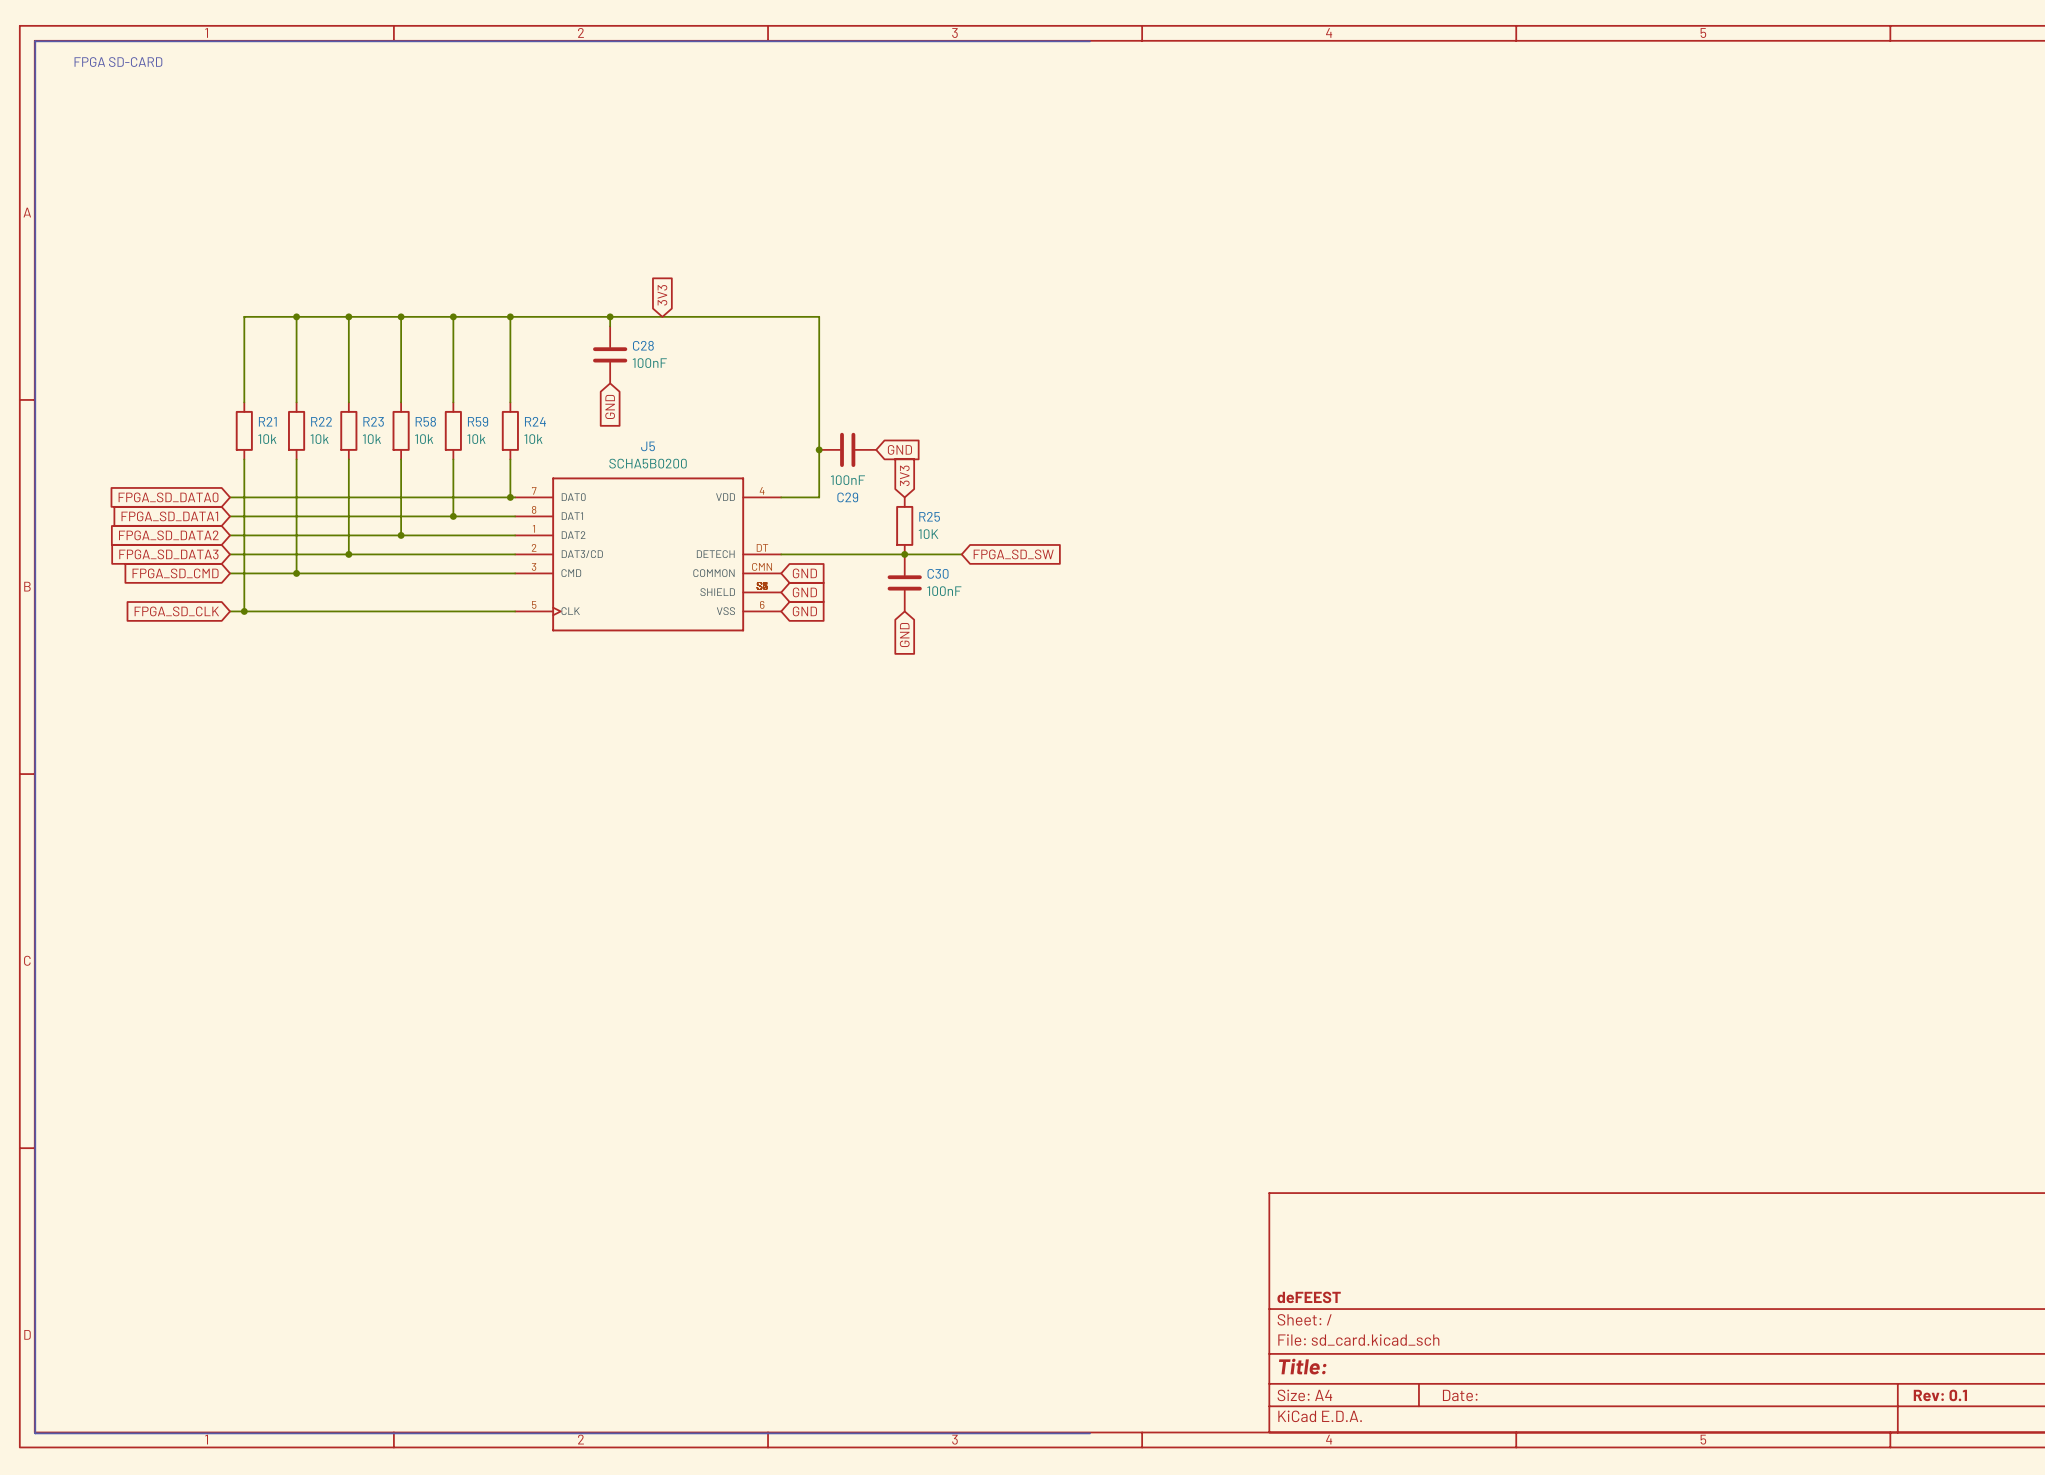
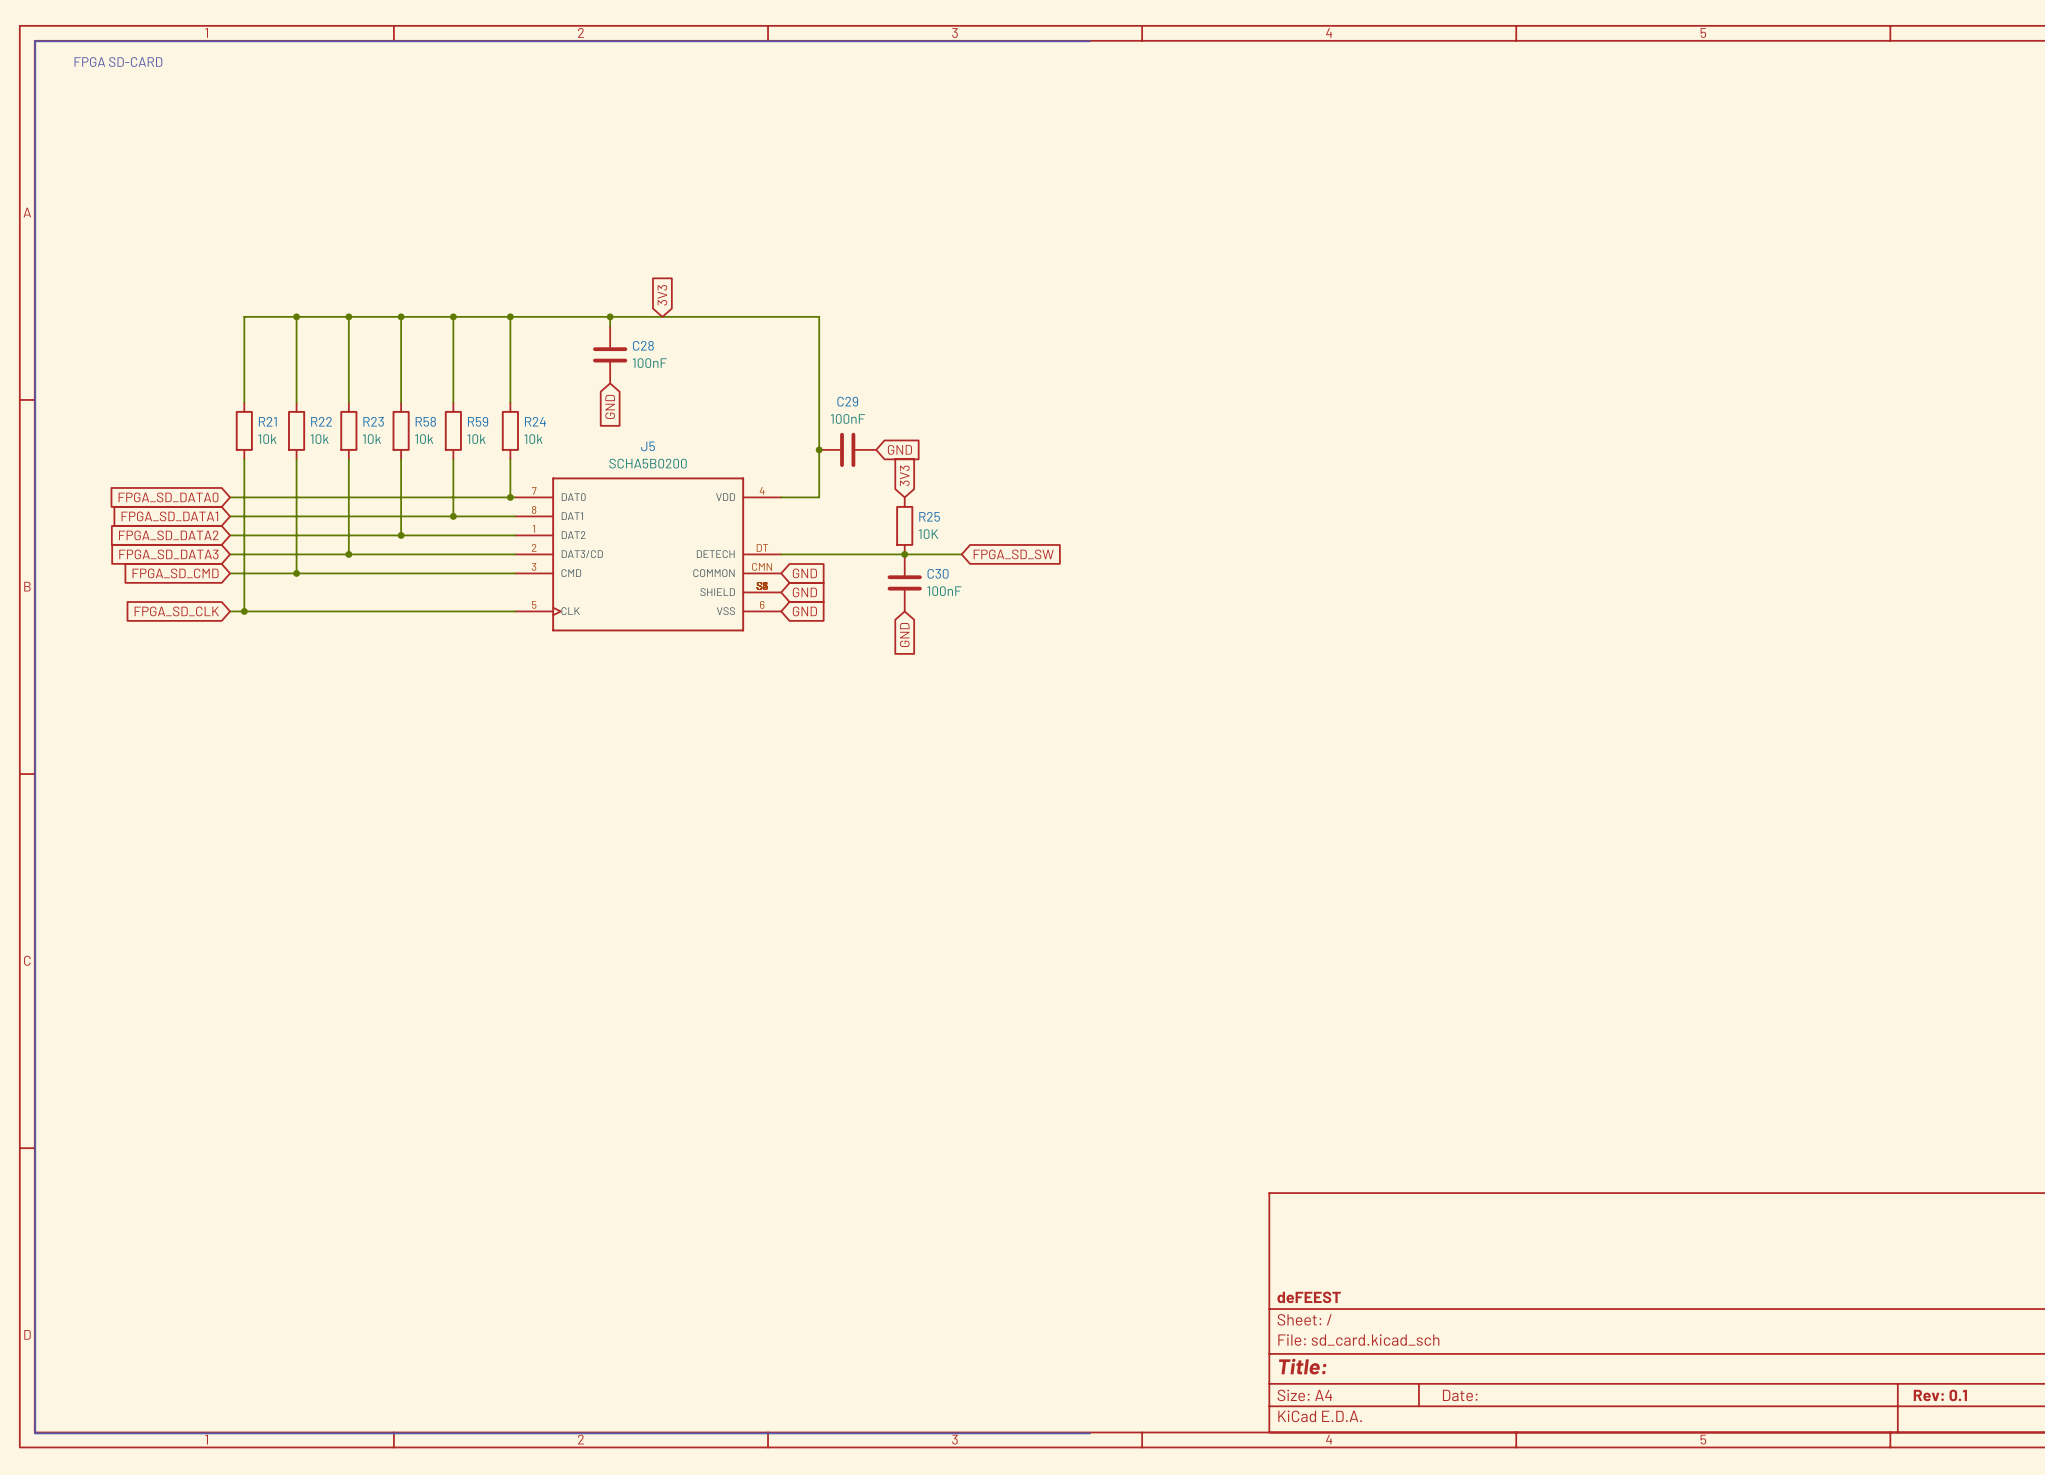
C29 value position: 100nF (847, 480) -> 100nF (847, 418)
C29 name position: C29 (847, 497) -> C29 (847, 401)

